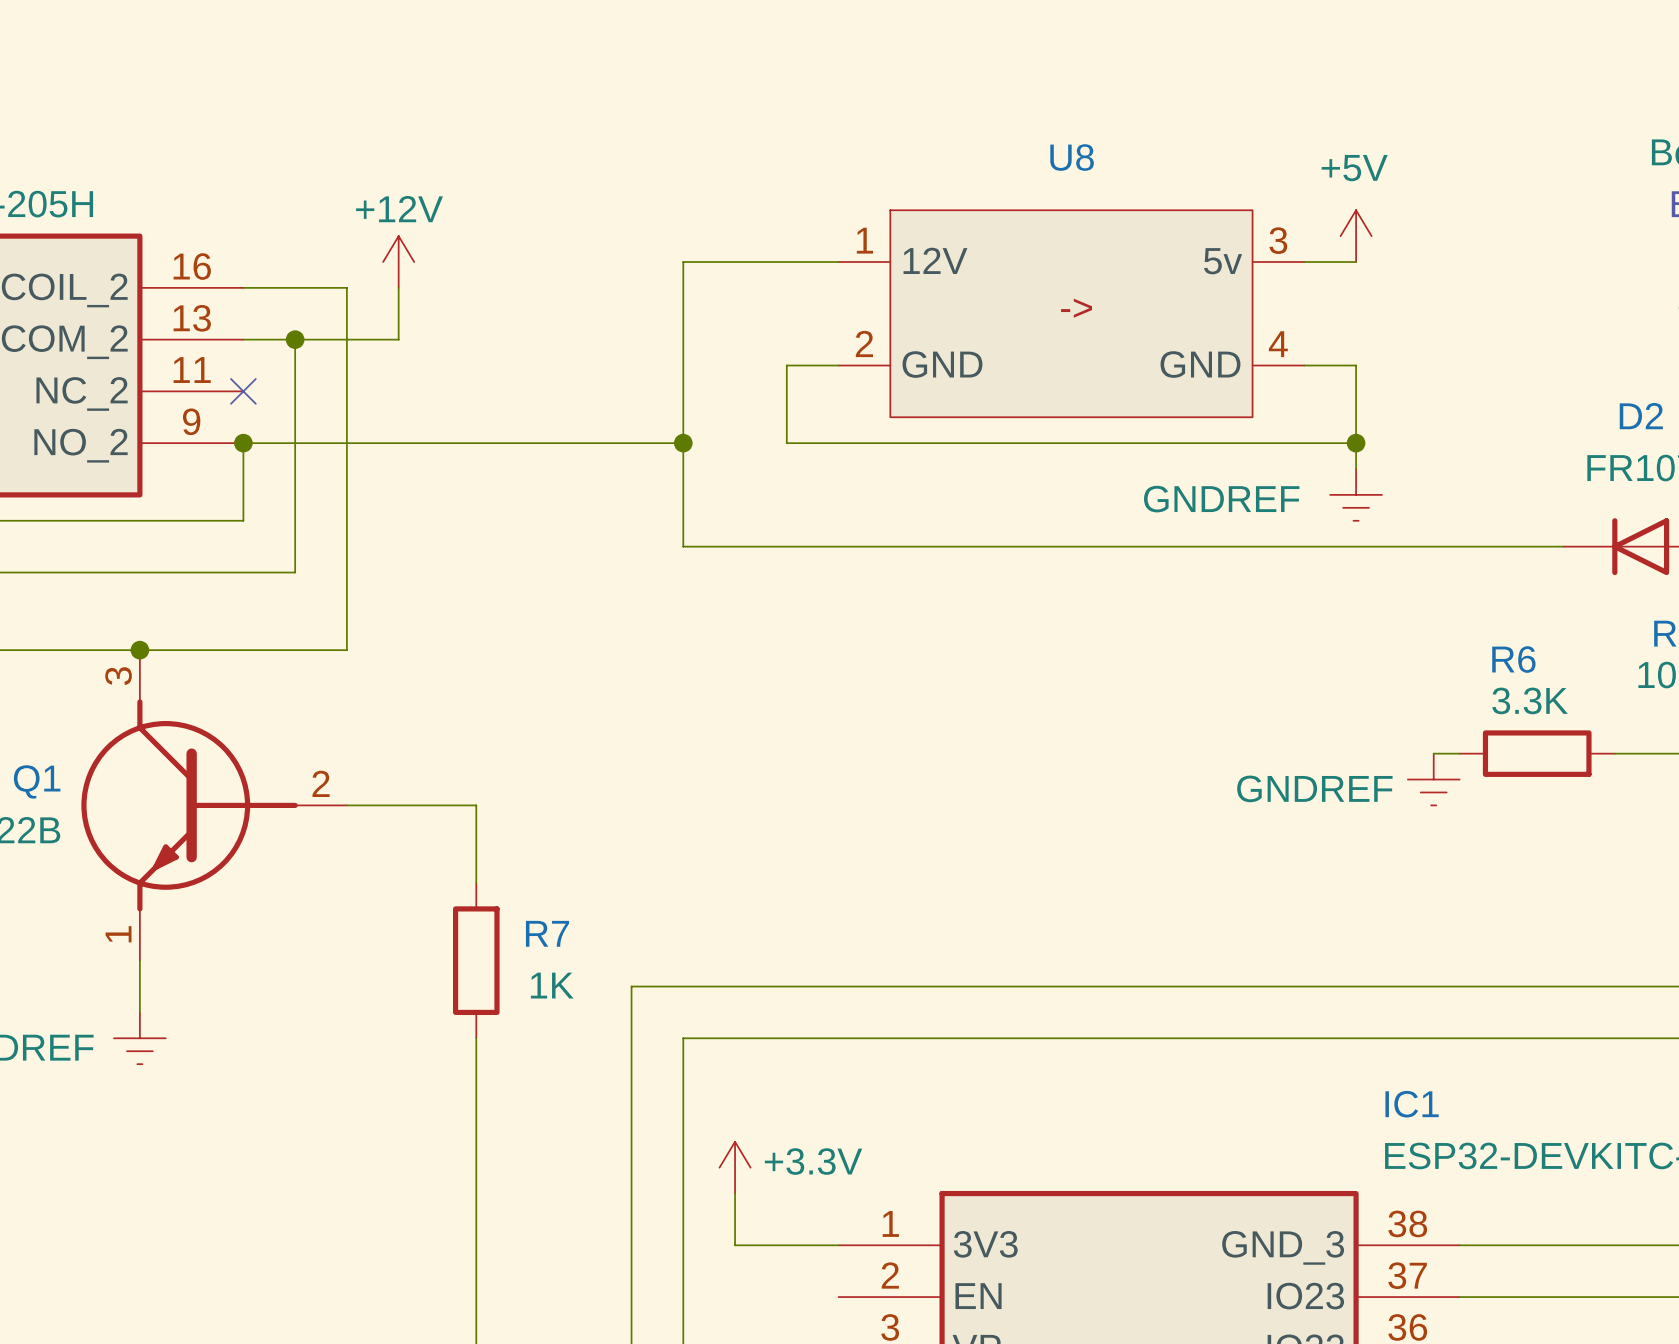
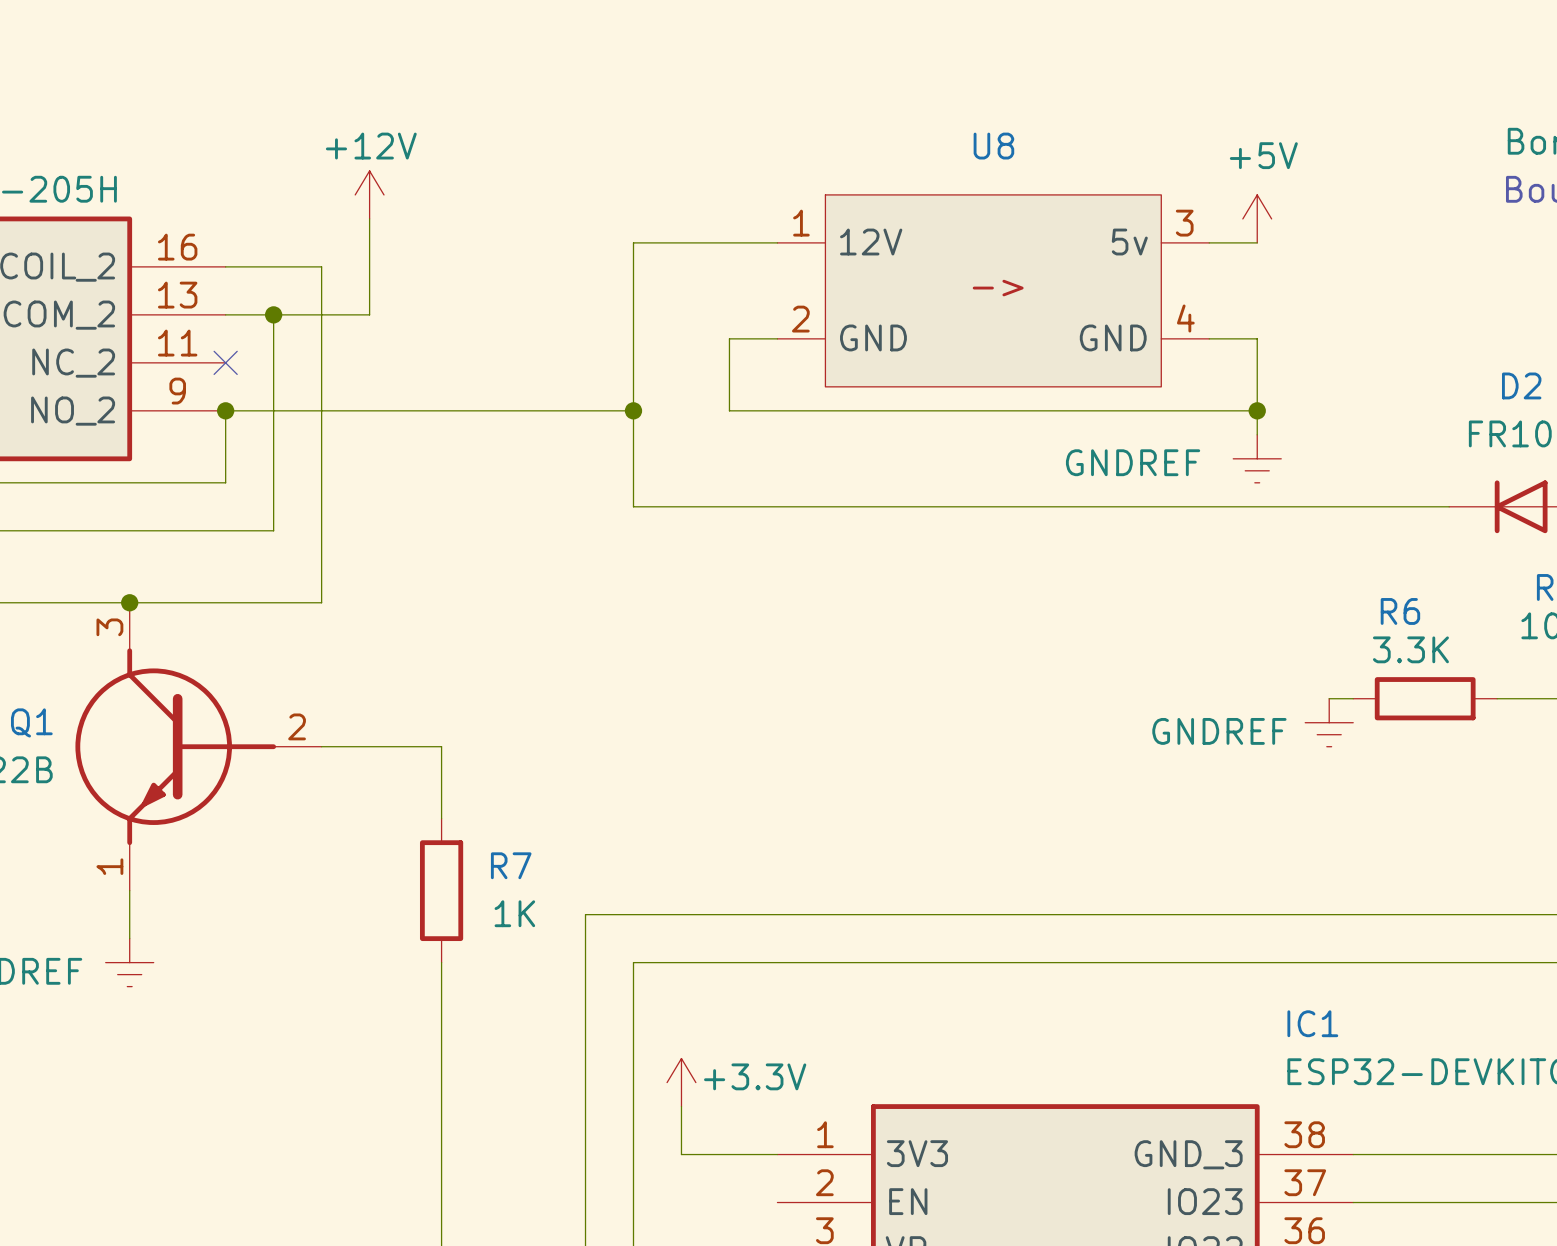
power symbol position: +12V (398, 262) -> +12V (369, 194)

